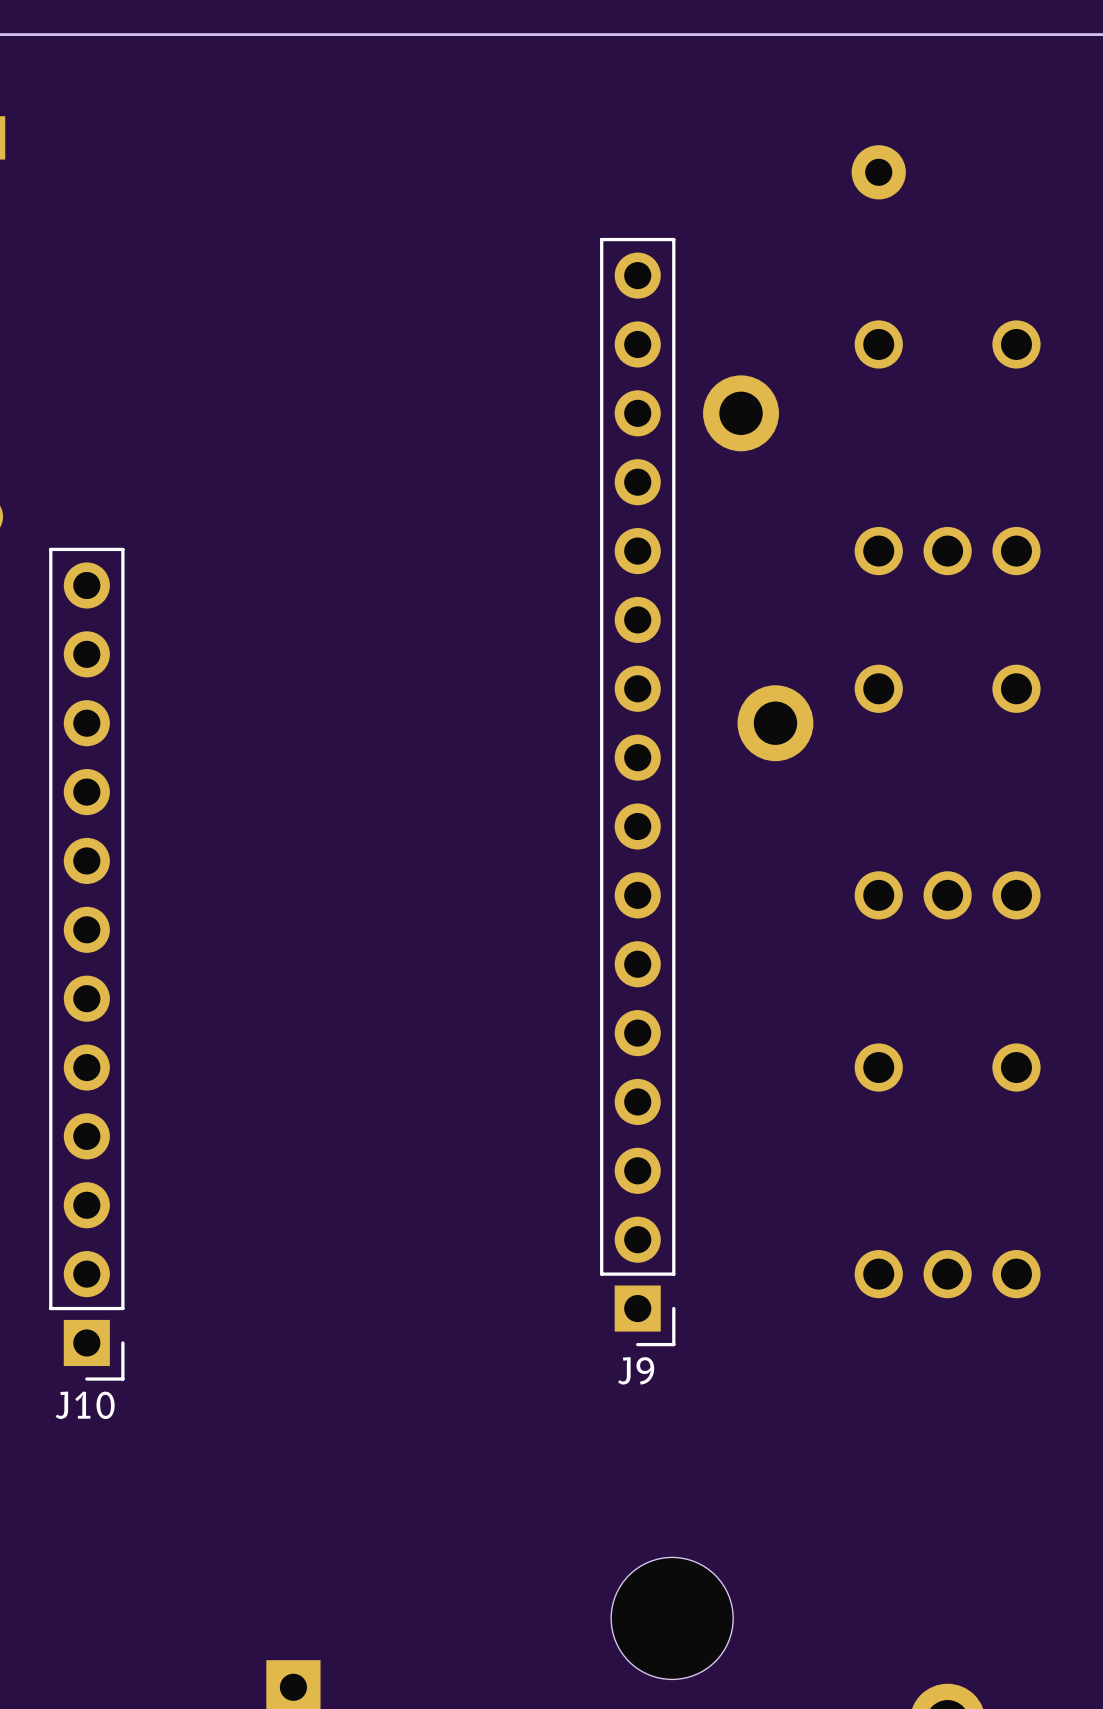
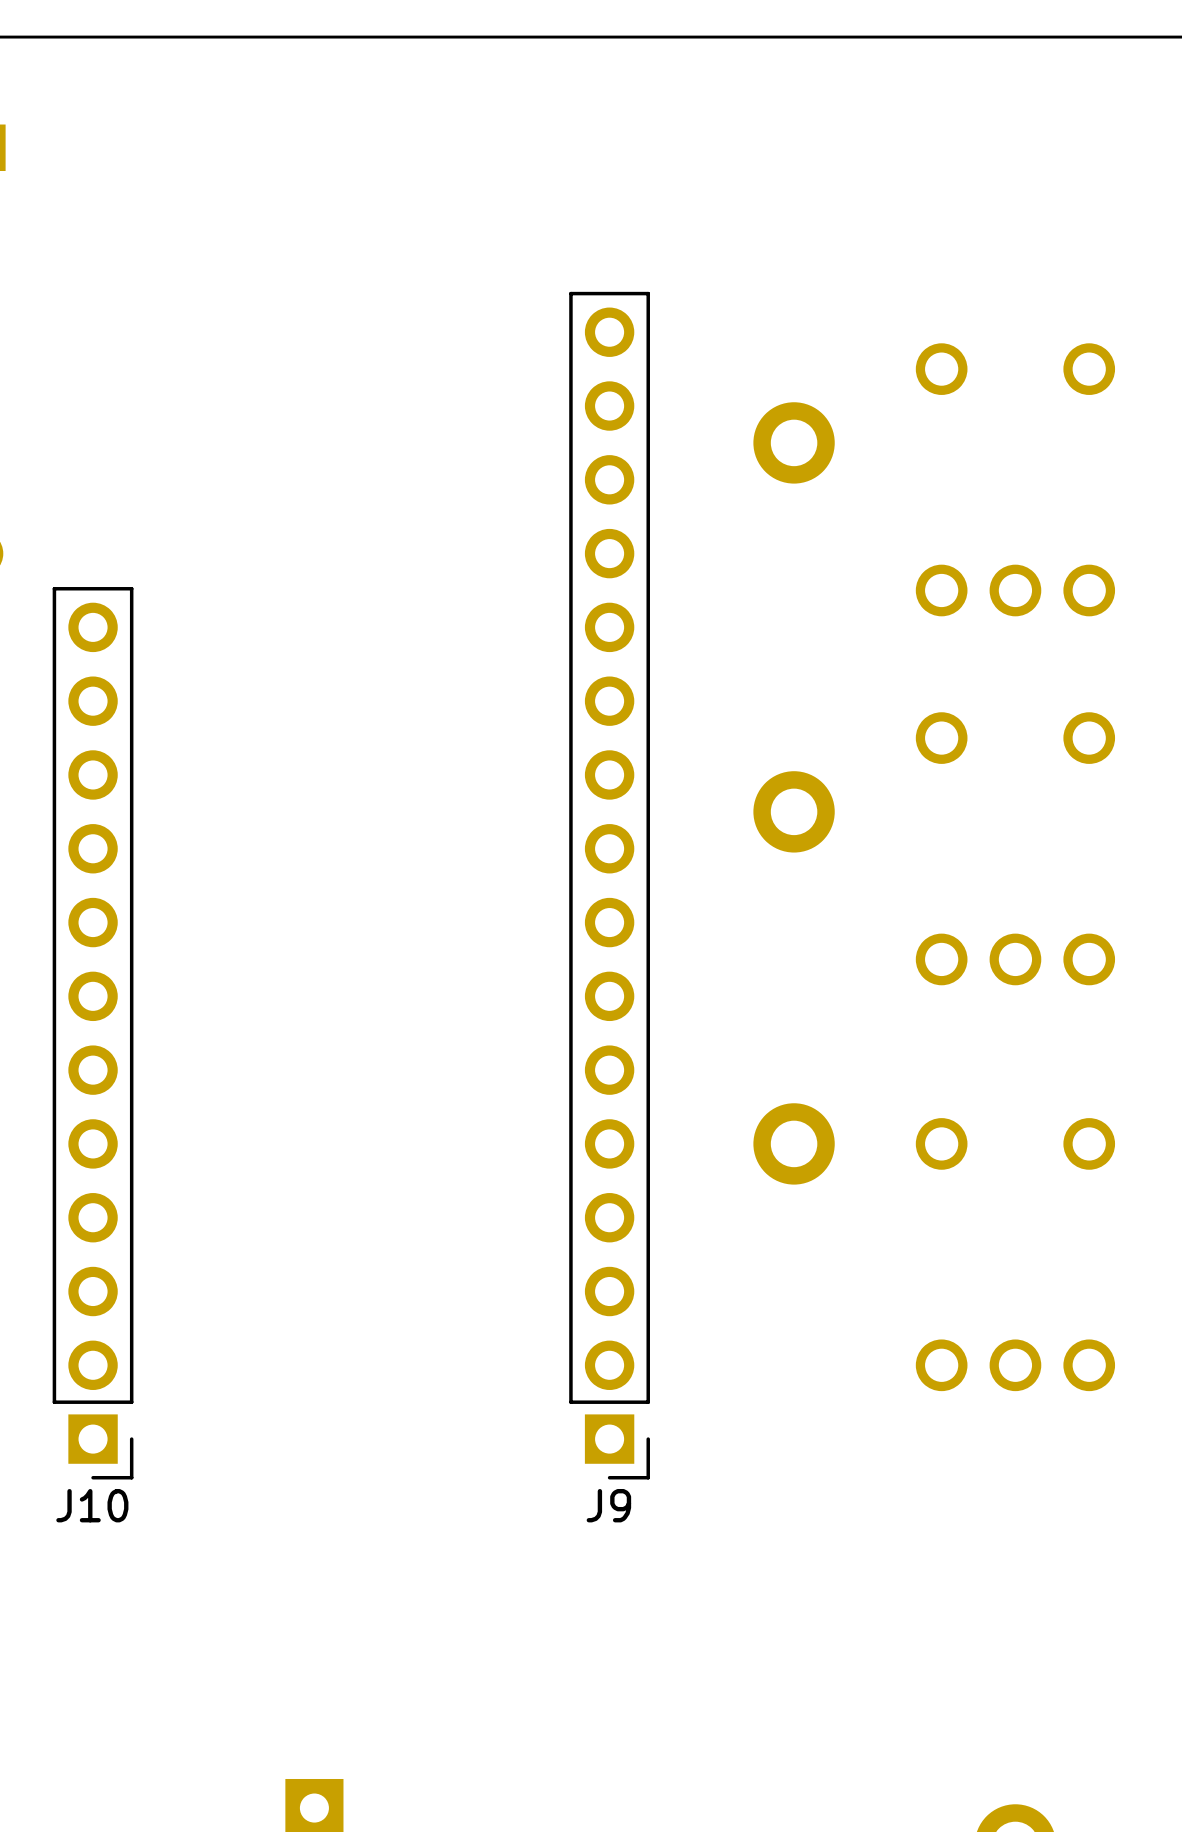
part: (878, 172) -> none
part position: (775, 723) -> (794, 811)
J9 position: (637, 792) -> (609, 885)
part: none -> (794, 1143)
part: (672, 1618) -> none

